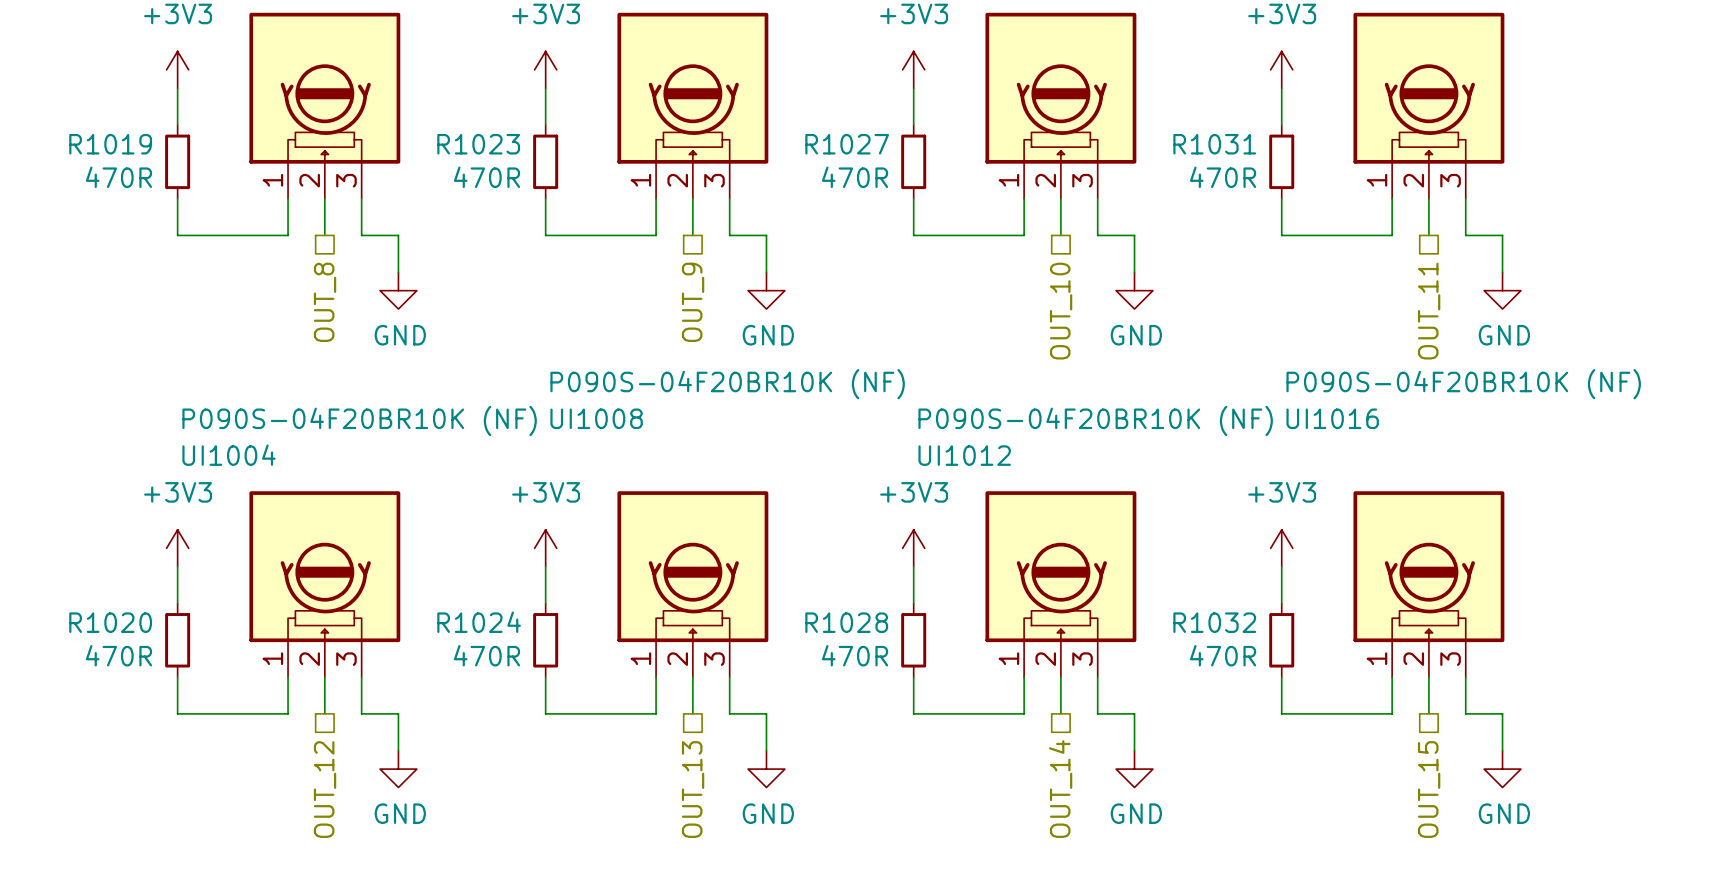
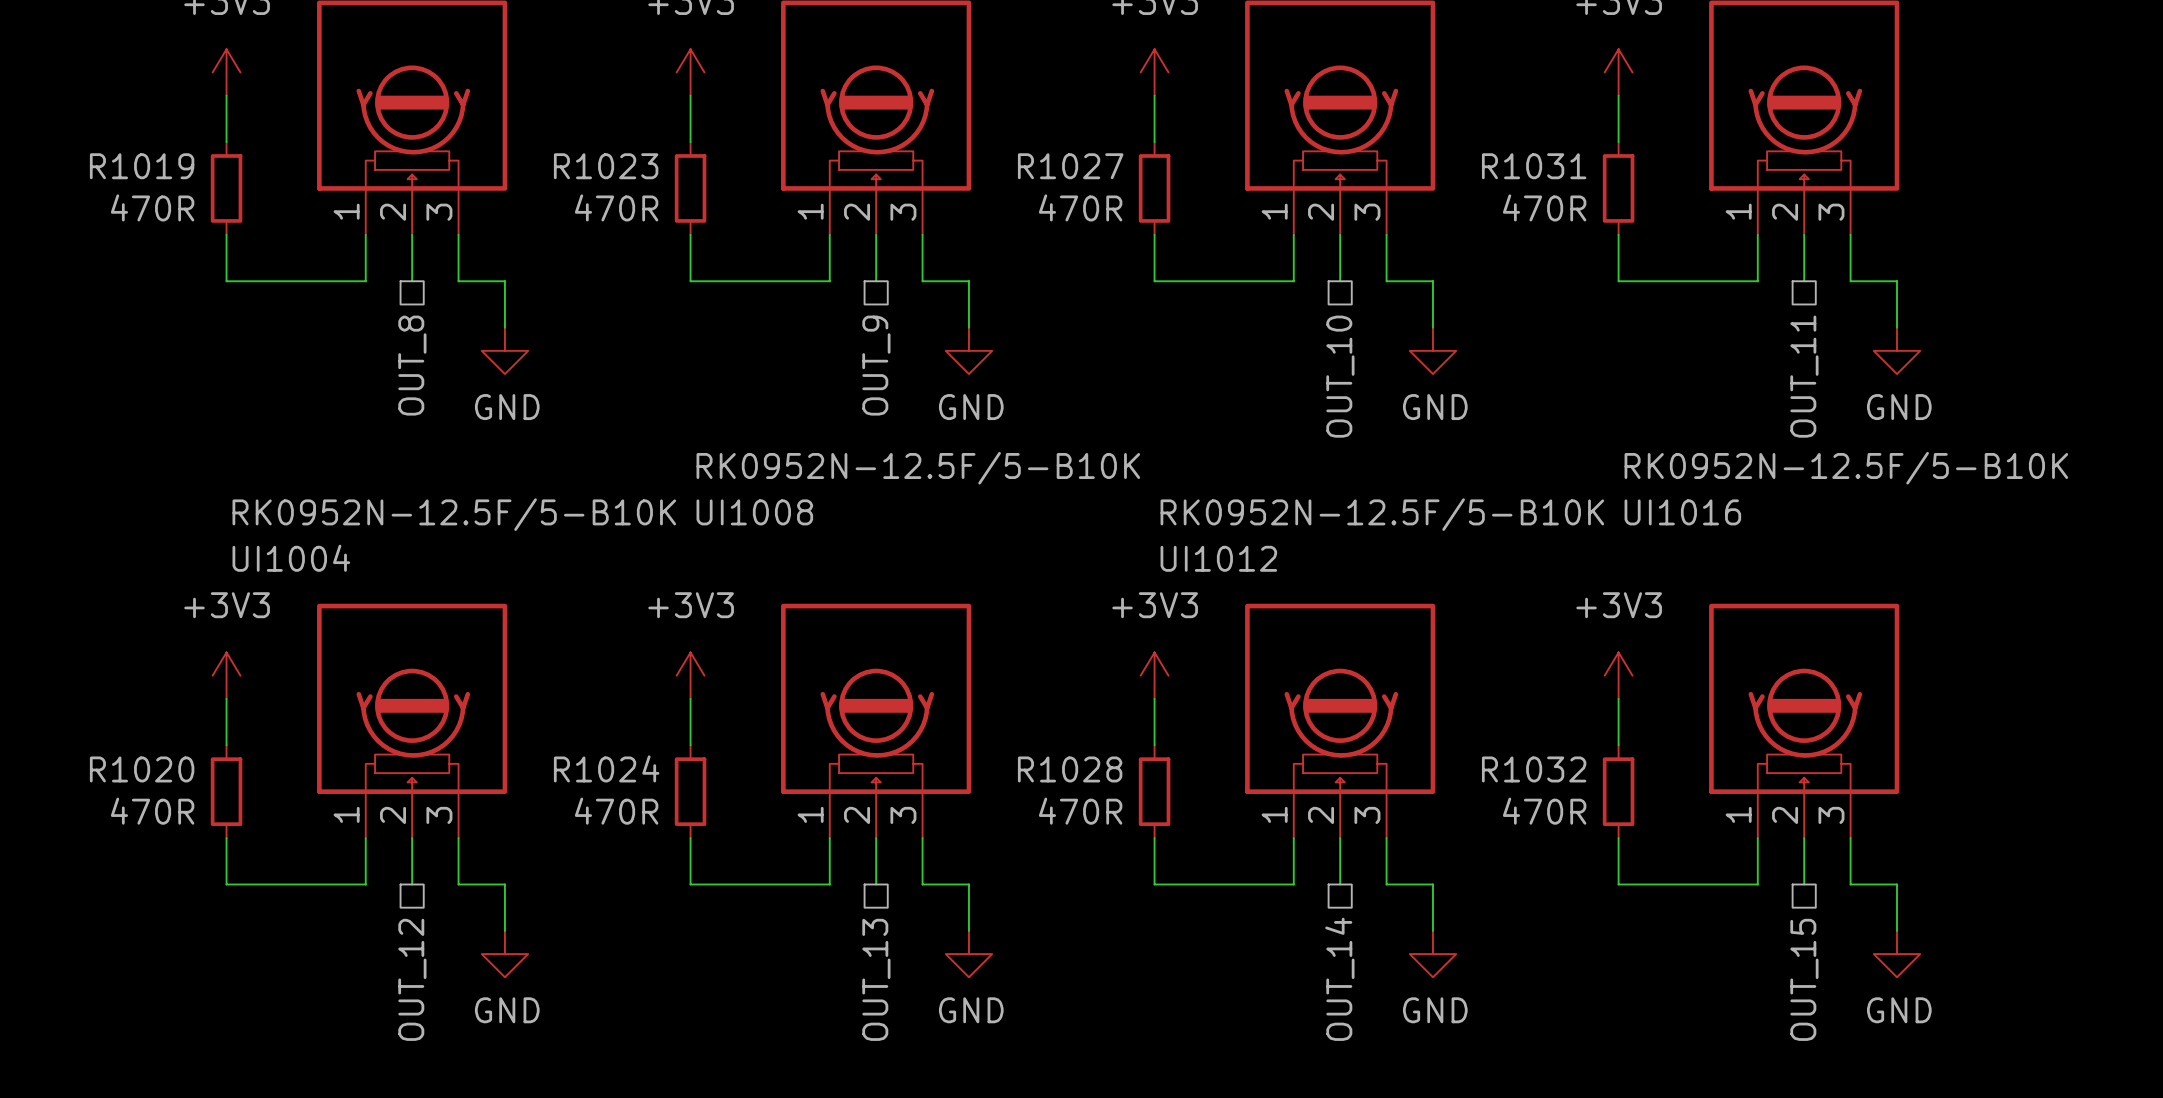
UI1008 value: P090S-04F20BR10K (NF) (727, 384) -> RK0952N-12.5F/5-B10K (918, 468)
UI1016 value: P090S-04F20BR10K (NF) (1463, 384) -> RK0952N-12.5F/5-B10K (1846, 468)
UI1004 value: P090S-04F20BR10K (NF) (359, 420) -> RK0952N-12.5F/5-B10K (454, 514)
UI1012 value: P090S-04F20BR10K (NF) (1095, 420) -> RK0952N-12.5F/5-B10K (1382, 514)

